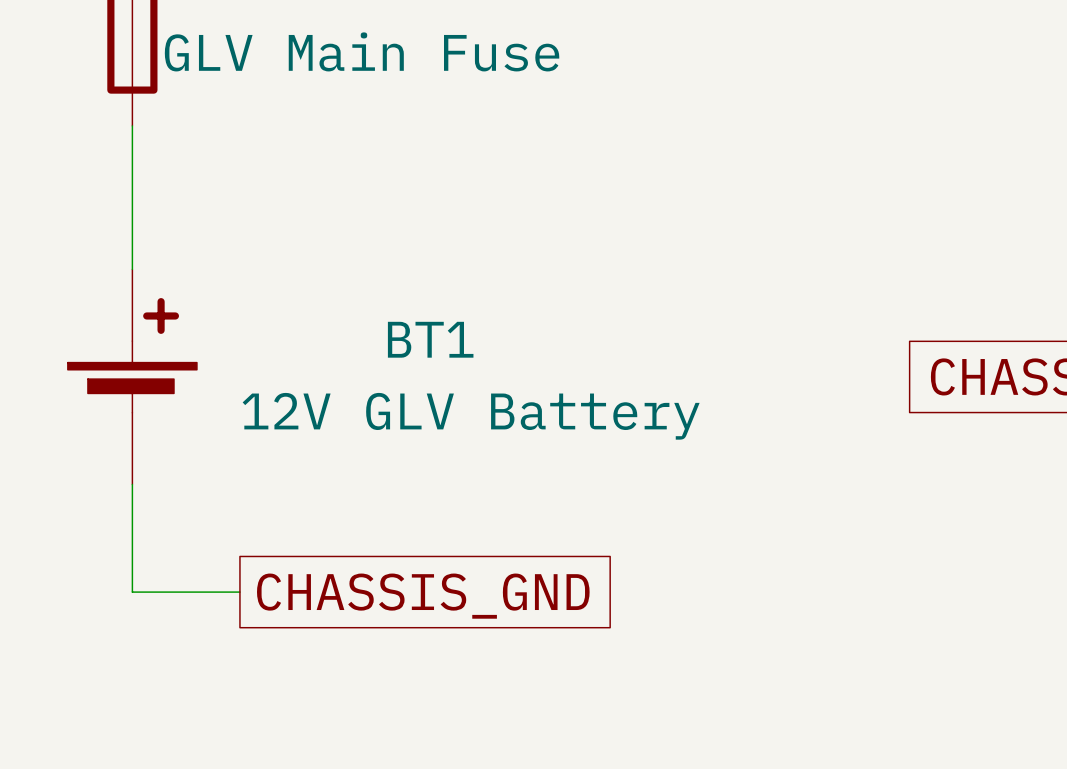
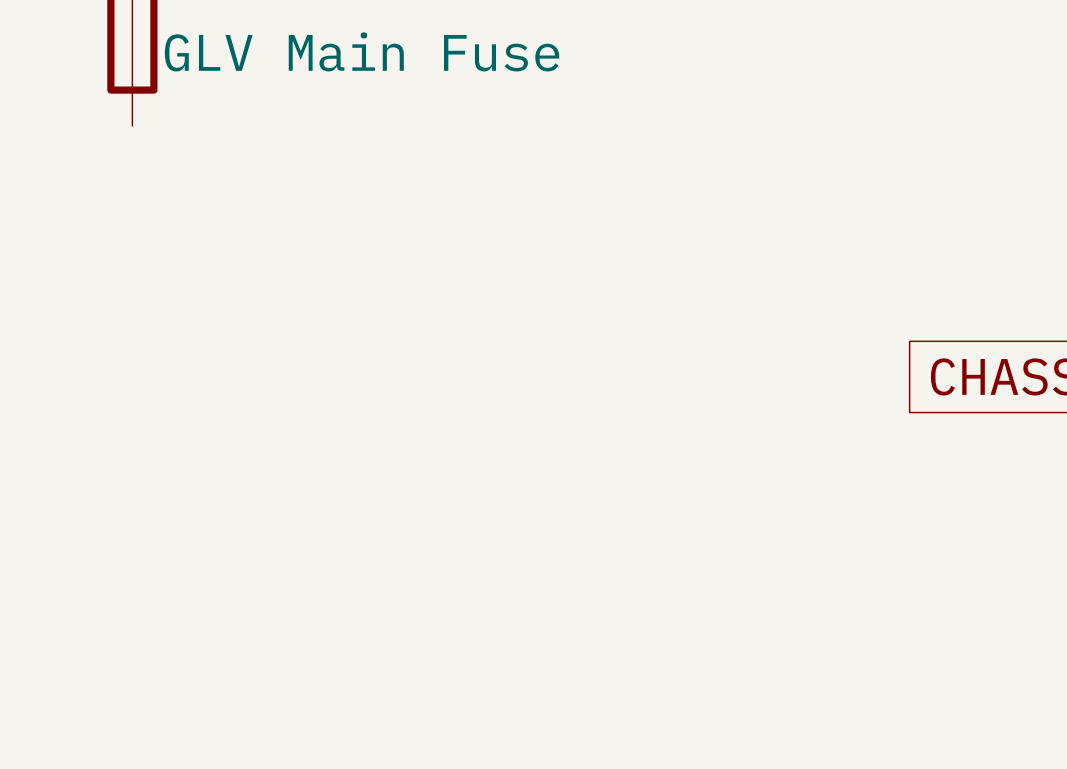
wire: (132, 125) (132, 269) -> none
BT1: 12V GLV Battery (132, 376) -> none
wire: (132, 484) (132, 592) (239, 592) -> none
global label: CHASSIS_GND (423, 596) -> none

